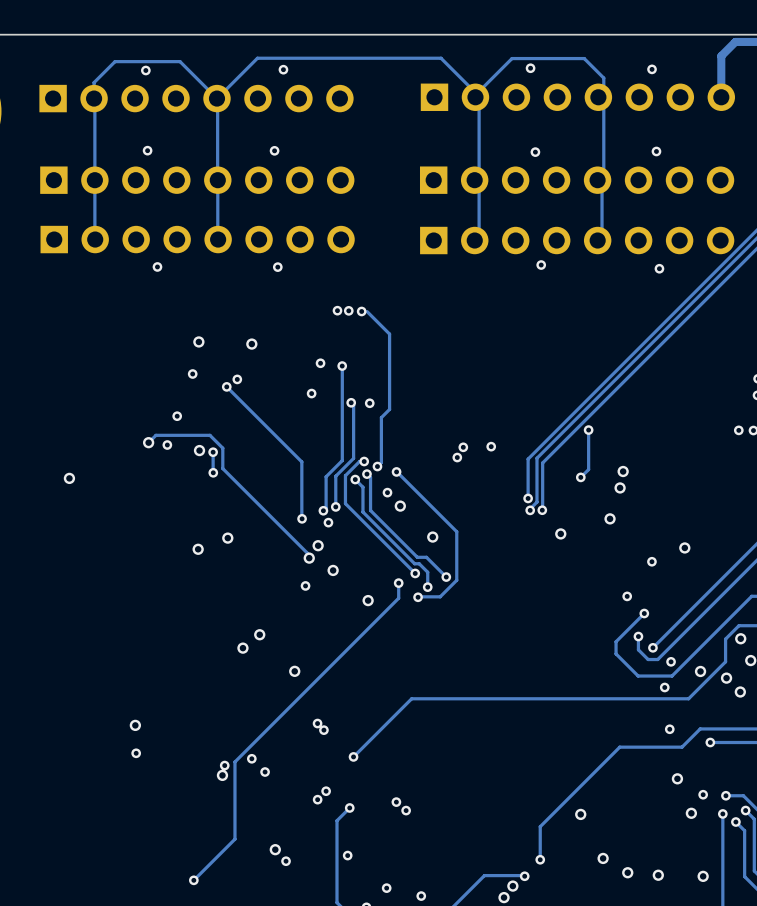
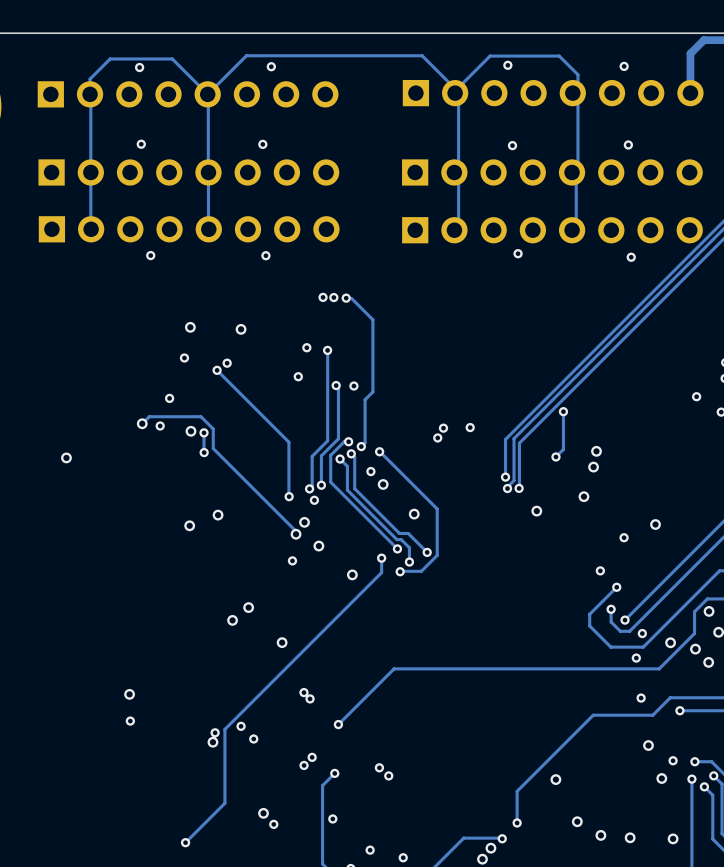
via: none -> (696, 396)
via: (738, 430) -> none

